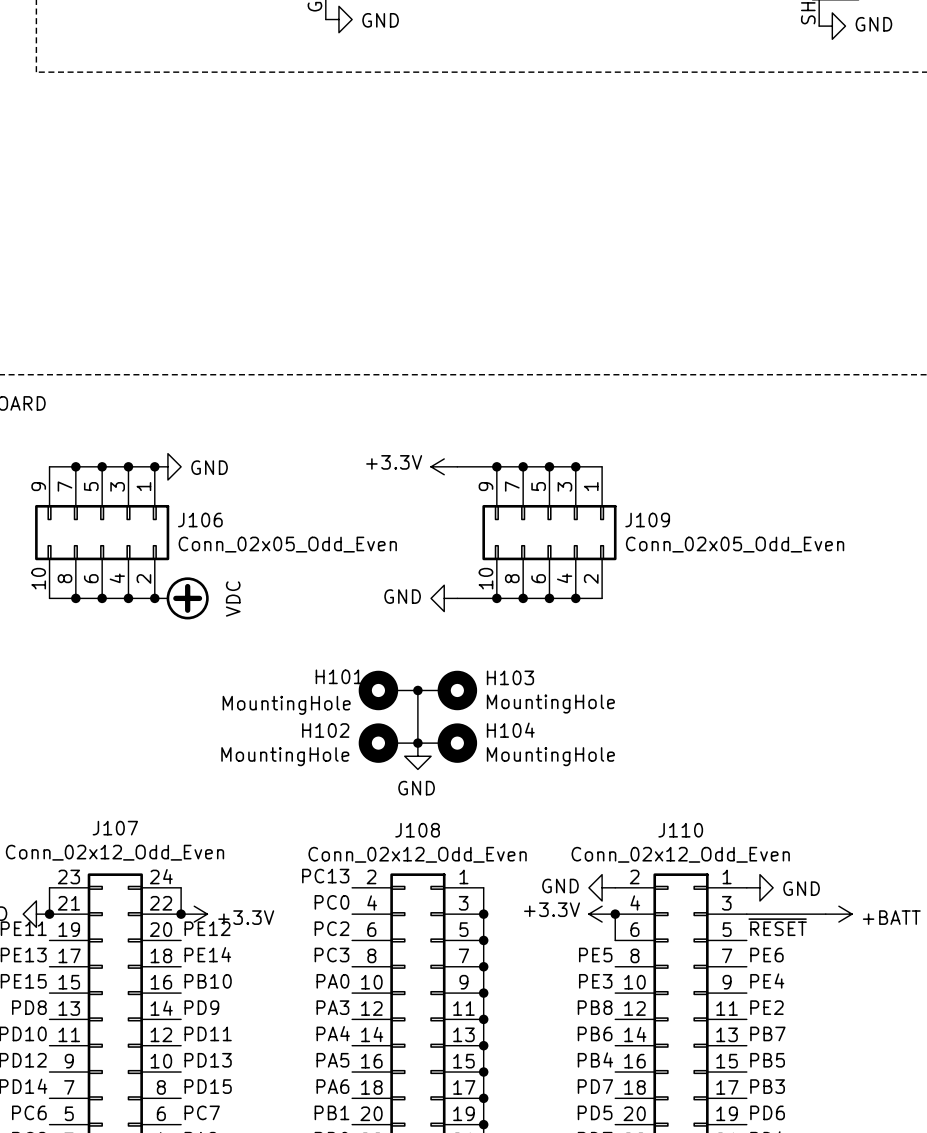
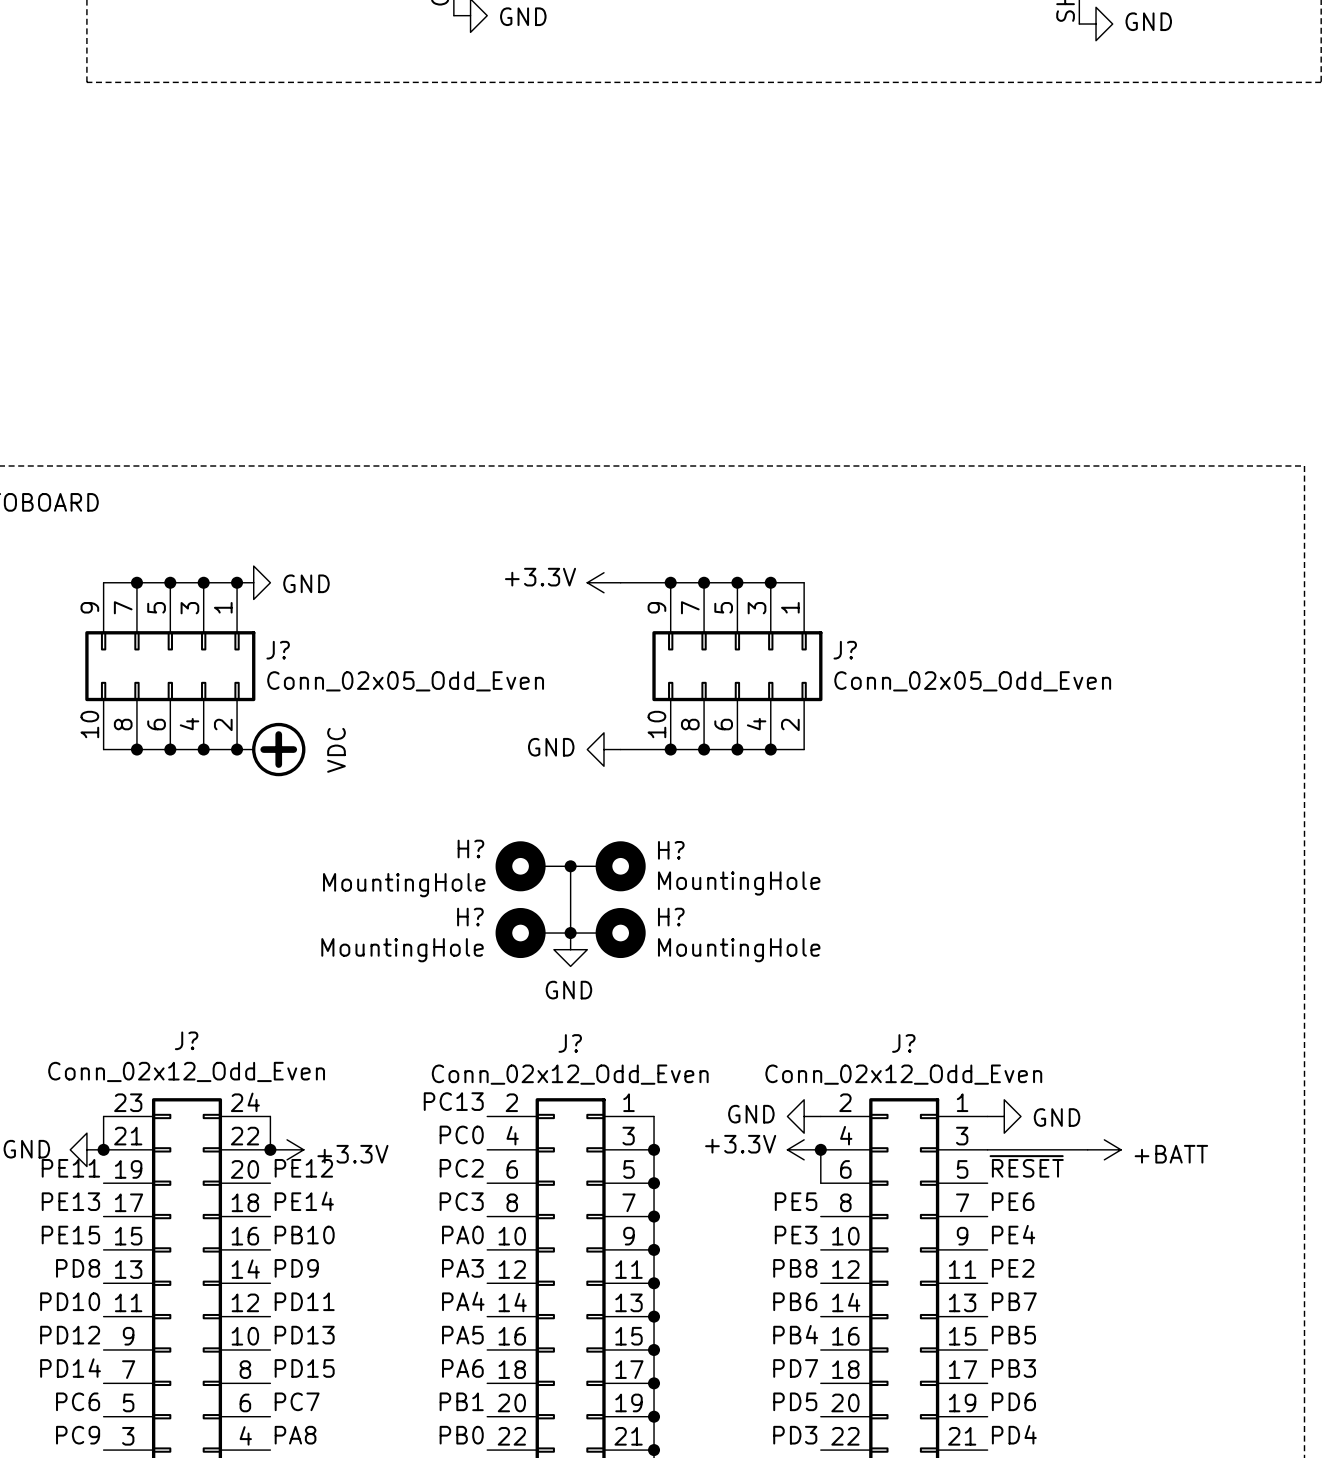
J106 name: J106 (200, 520) -> J? (278, 650)
J109 name: J109 (647, 520) -> J? (845, 650)
H101 name: H101 (339, 676) -> H? (470, 848)
H103 name: H103 (510, 677) -> H? (671, 850)
H102 name: H102 (325, 730) -> H? (470, 917)
H104 name: H104 (510, 730) -> H? (671, 917)
J107 name: J107 (115, 828) -> J? (186, 1040)
J108 name: J108 (417, 830) -> J? (570, 1043)
J110 name: J110 (680, 830) -> J? (903, 1043)

